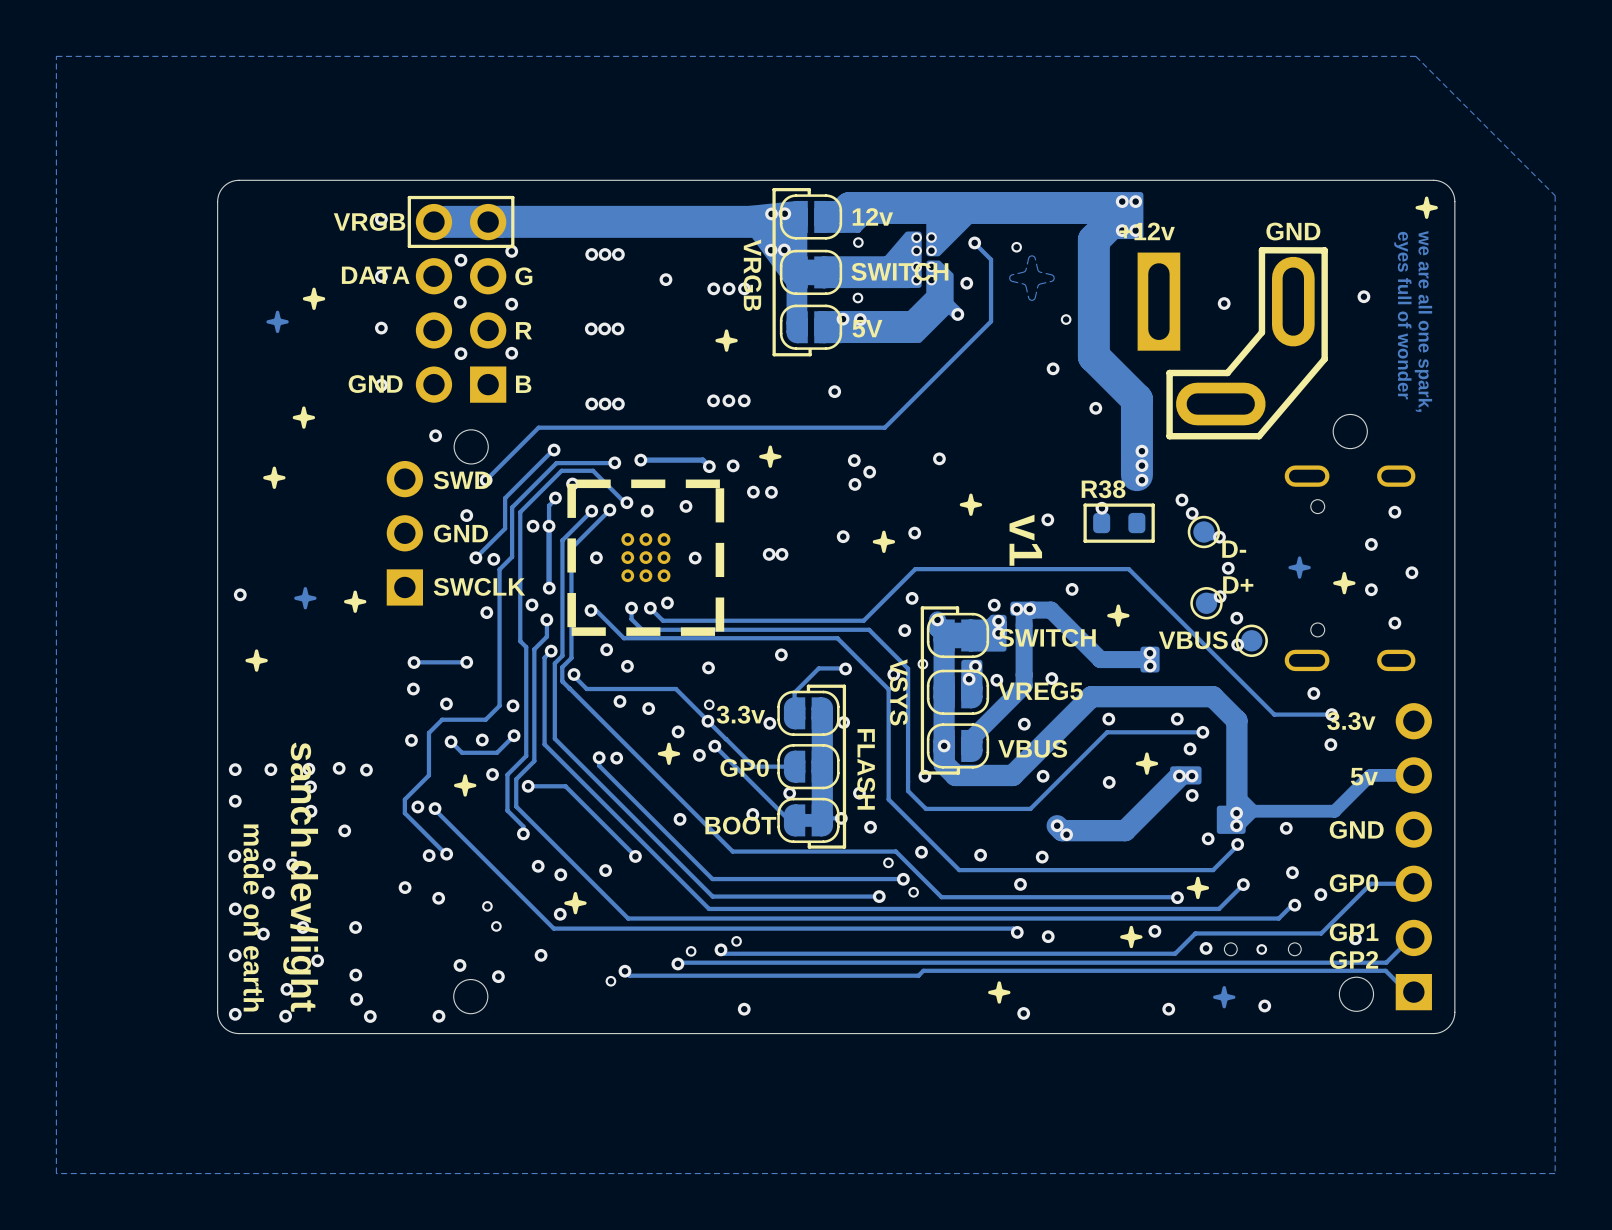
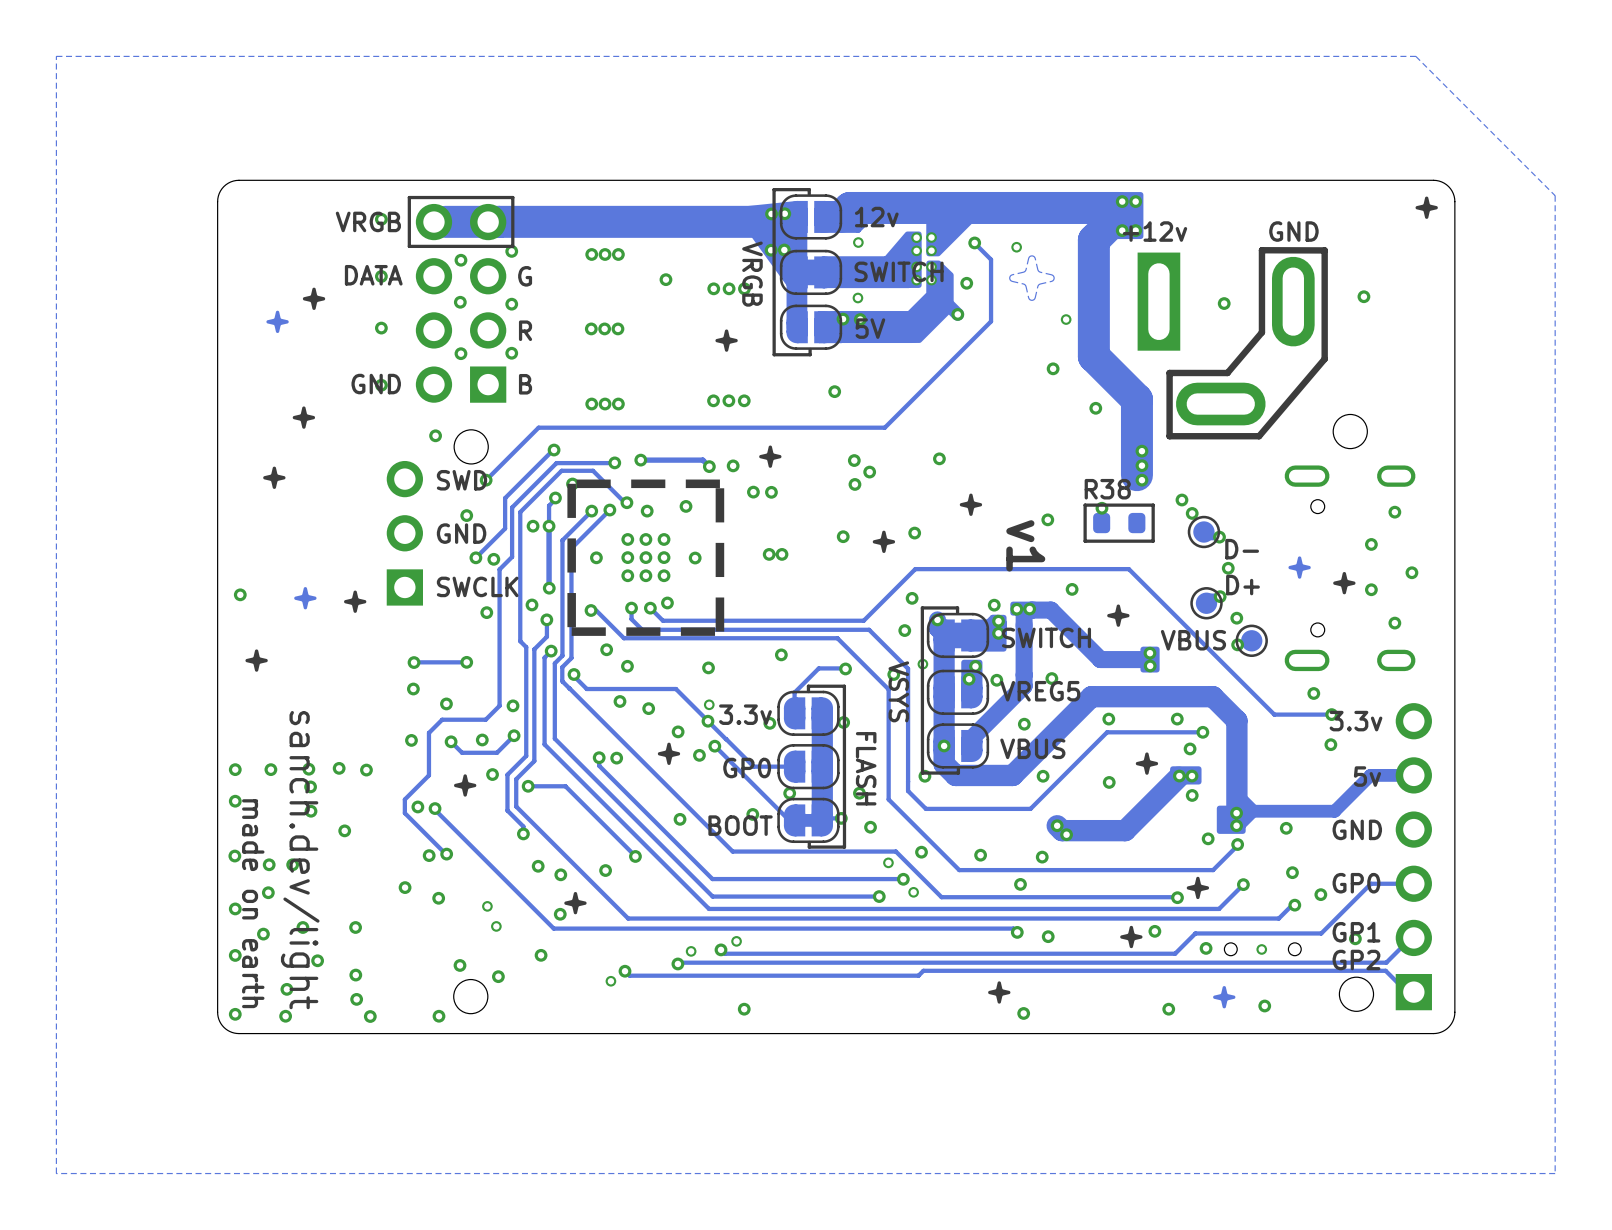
text: eyes full of wonder (1402, 315) -> none
text: we are all one spark, (1423, 321) -> none

